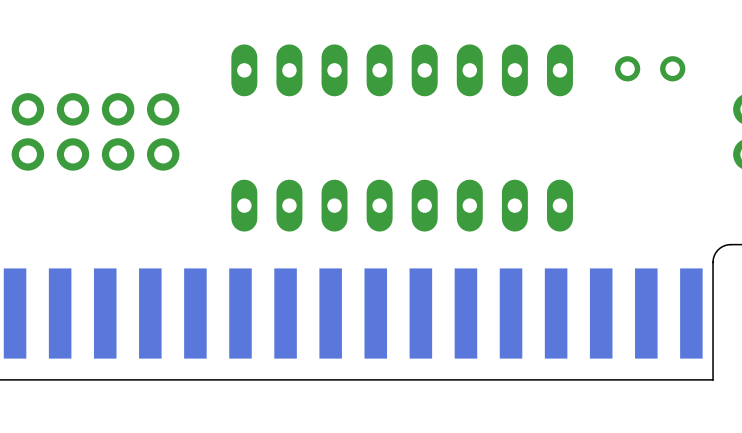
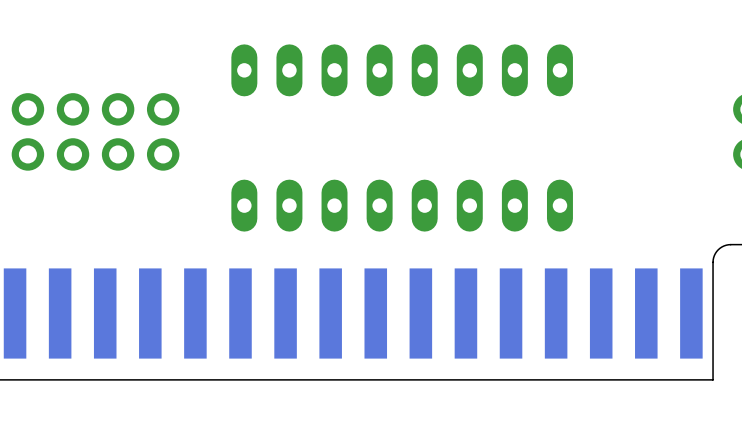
part: (650, 68) -> none

